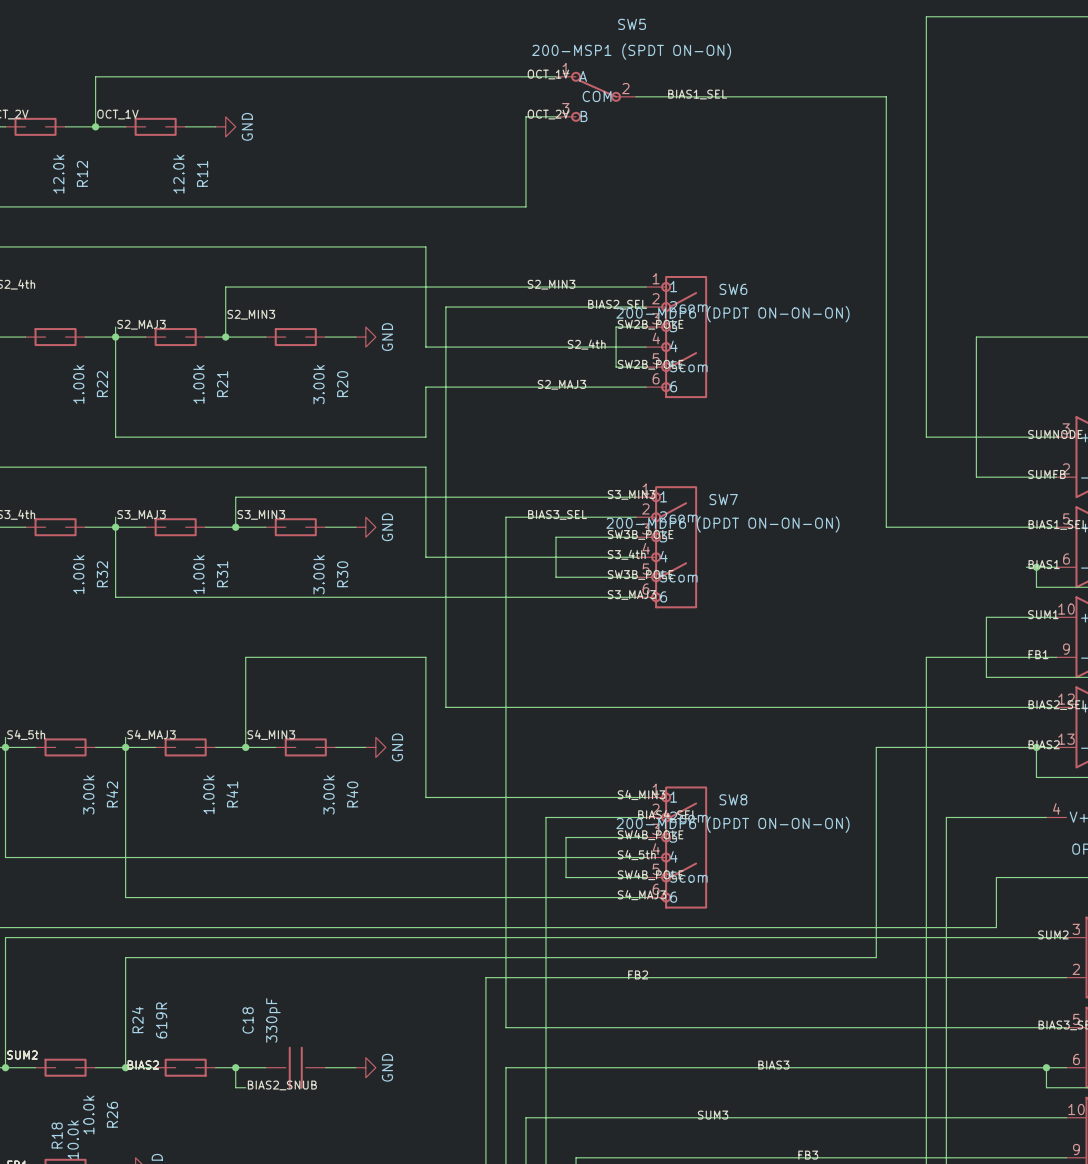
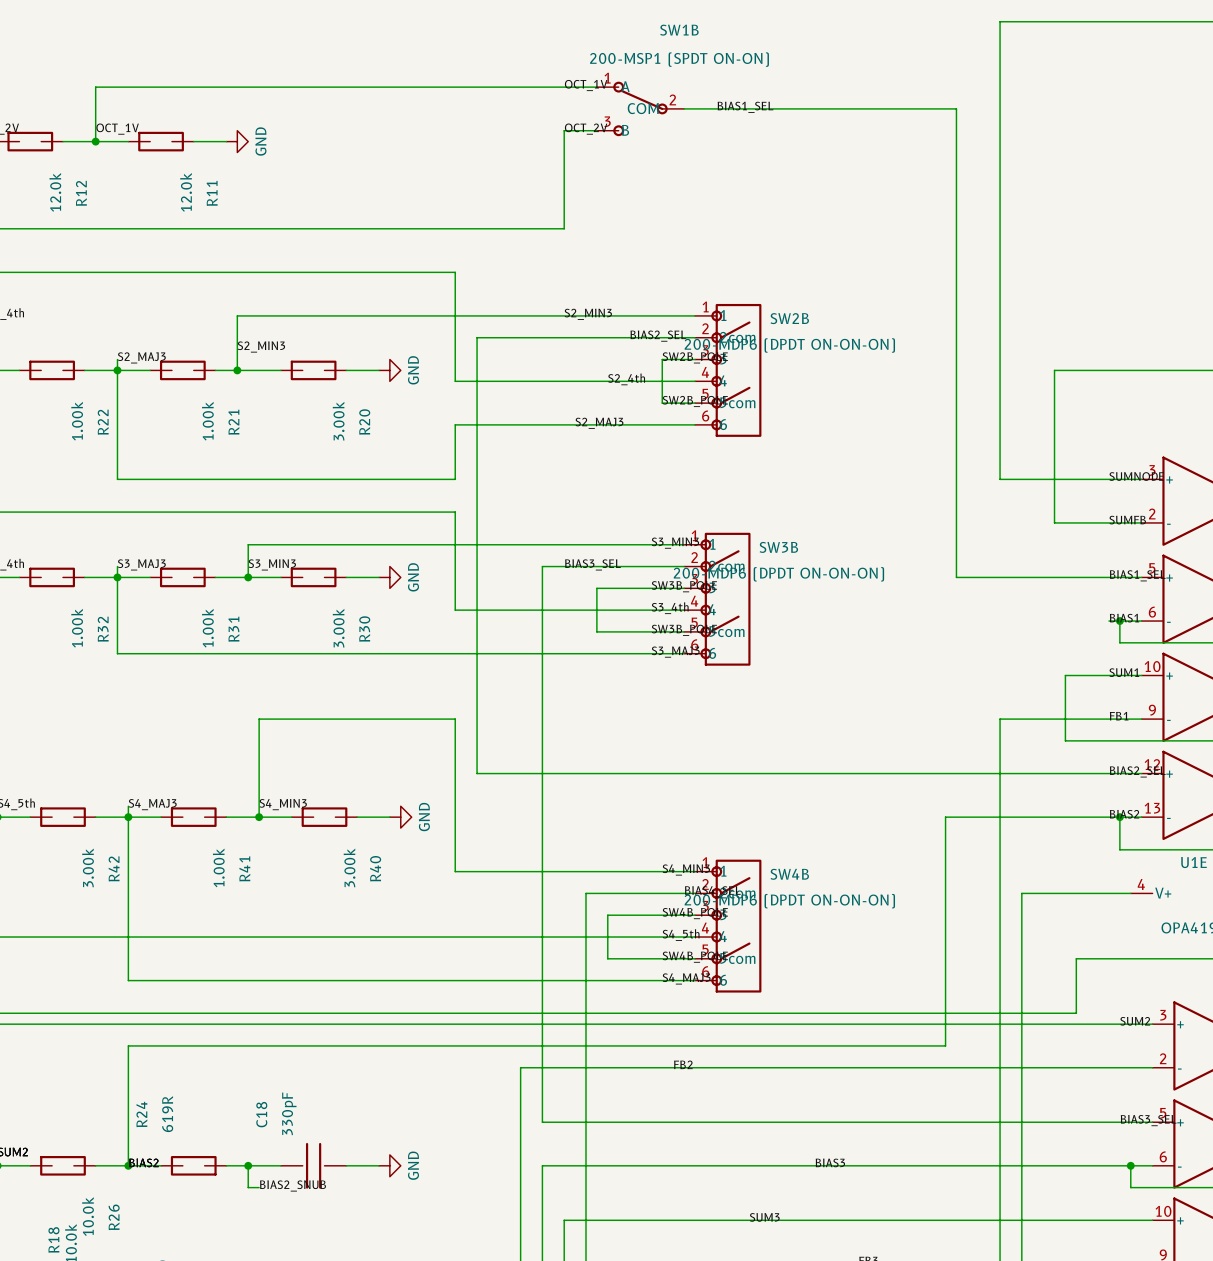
SW5 name: SW5 (632, 24) -> SW1B (679, 30)
SW6 name: SW6 (733, 289) -> SW2B (789, 318)
SW7 name: SW7 (723, 499) -> SW3B (778, 547)
SW8 name: SW8 (733, 799) -> SW4B (789, 874)

